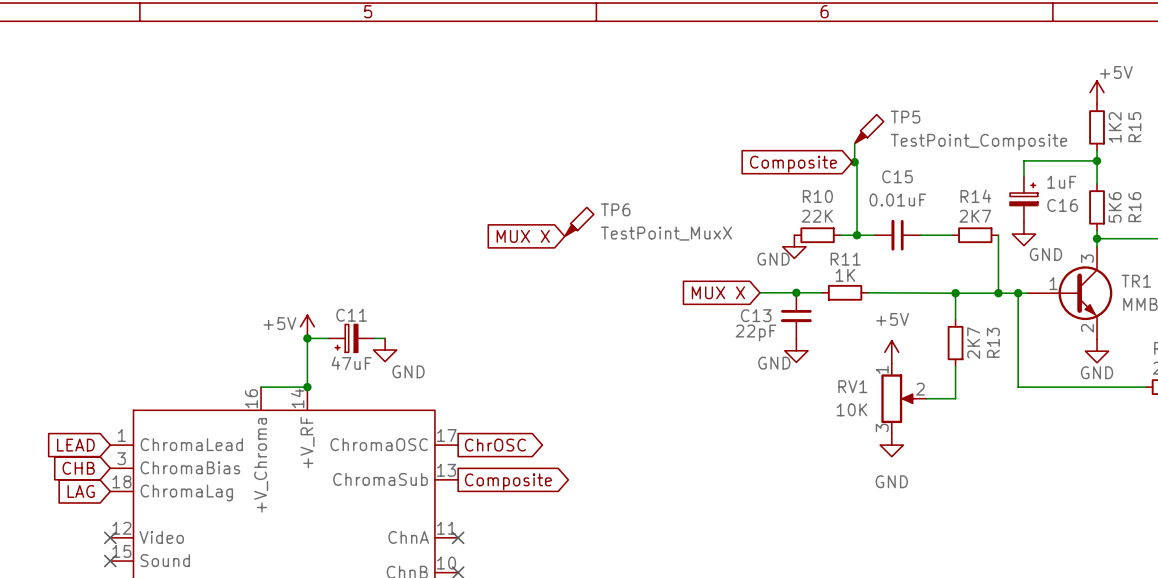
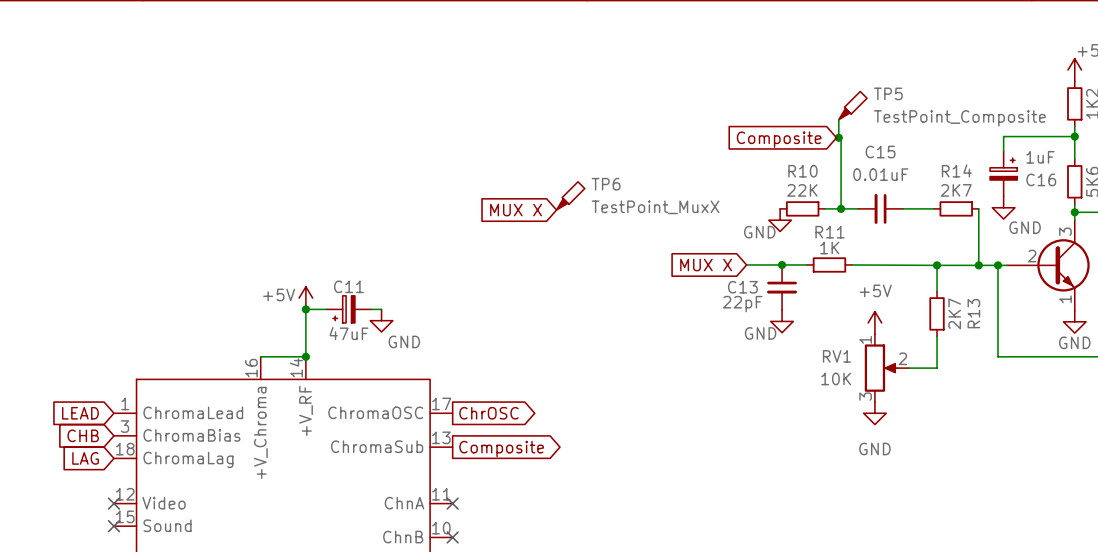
TR1 pin number: 1 (1053, 283) -> 2 (1032, 256)
TR1 pin number: 2 (1087, 328) -> 1 (1065, 299)

